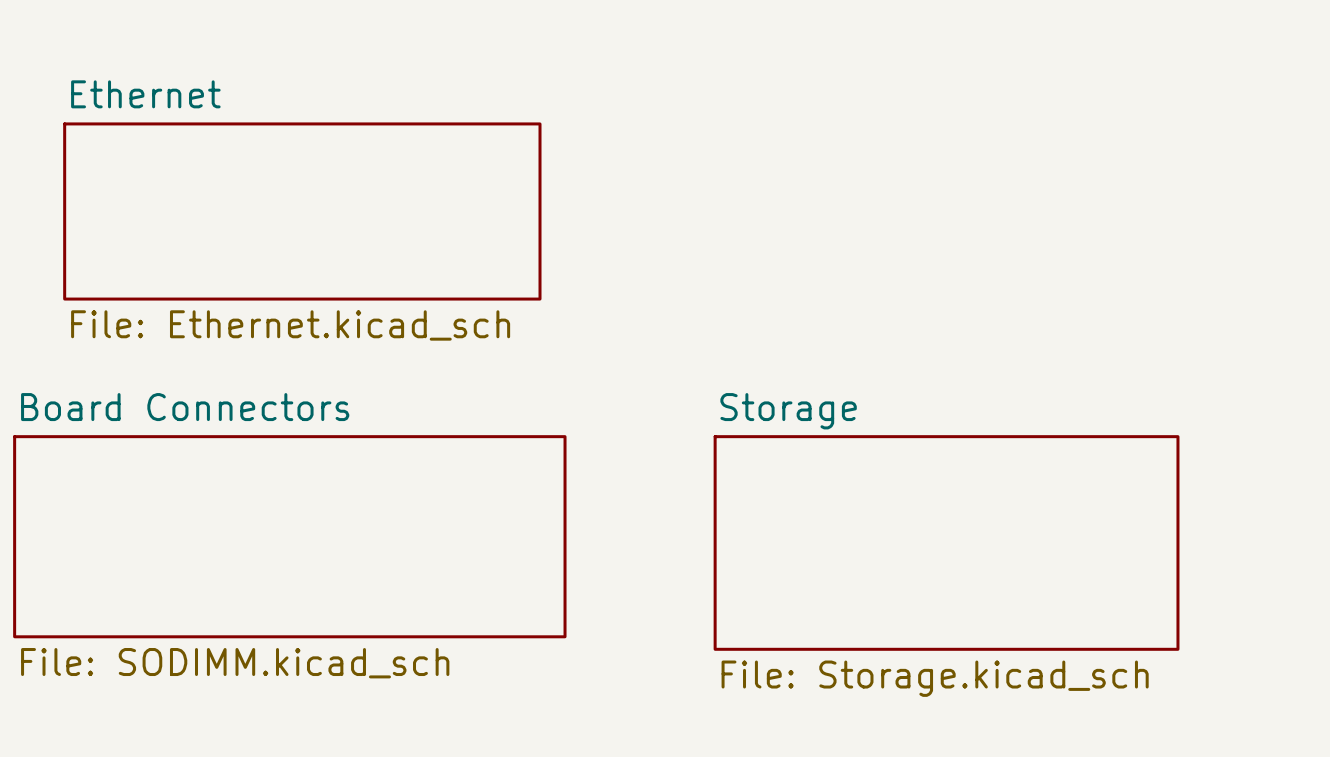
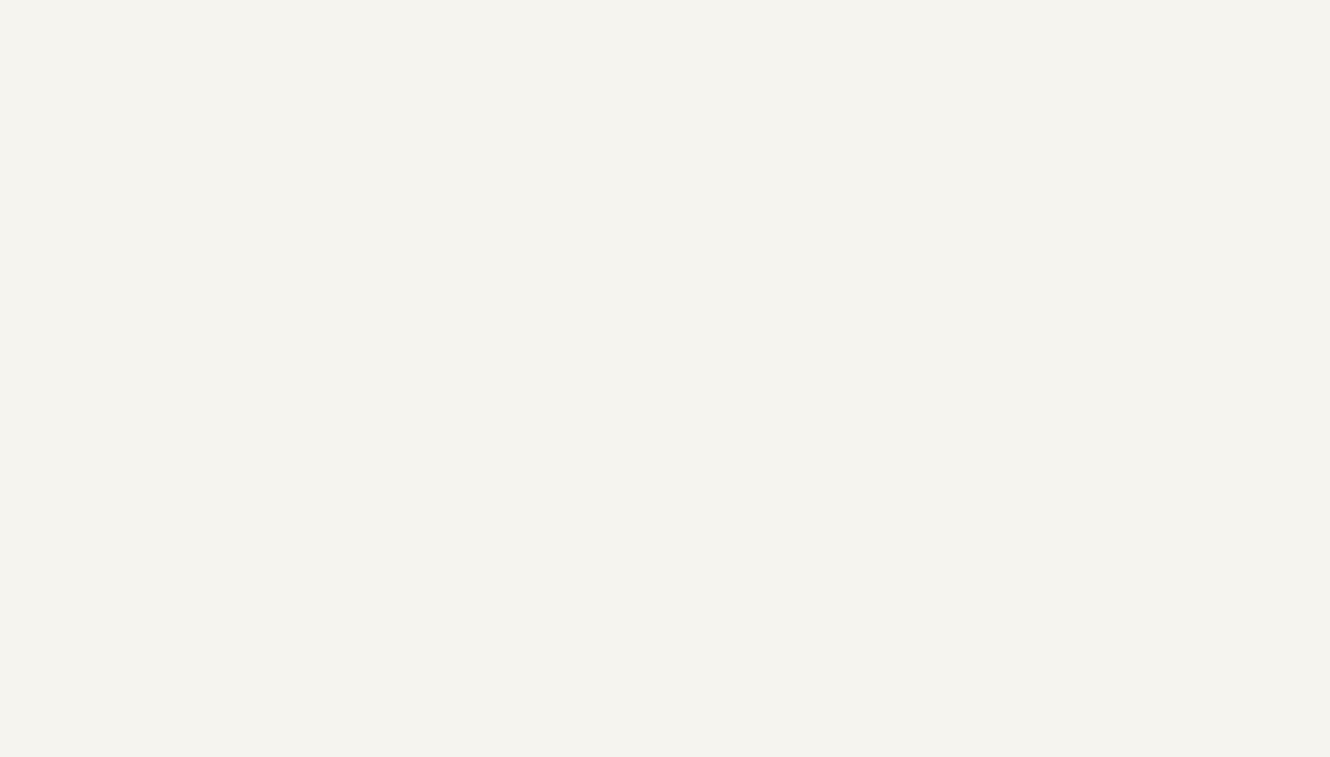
sheet Ethernet: File: Ethernet.kicad_sch (302, 211) -> none
sheet Board Connectors: File: SODIMM.kicad_sch (289, 536) -> none
sheet Storage: File: Storage.kicad_sch (946, 542) -> none

